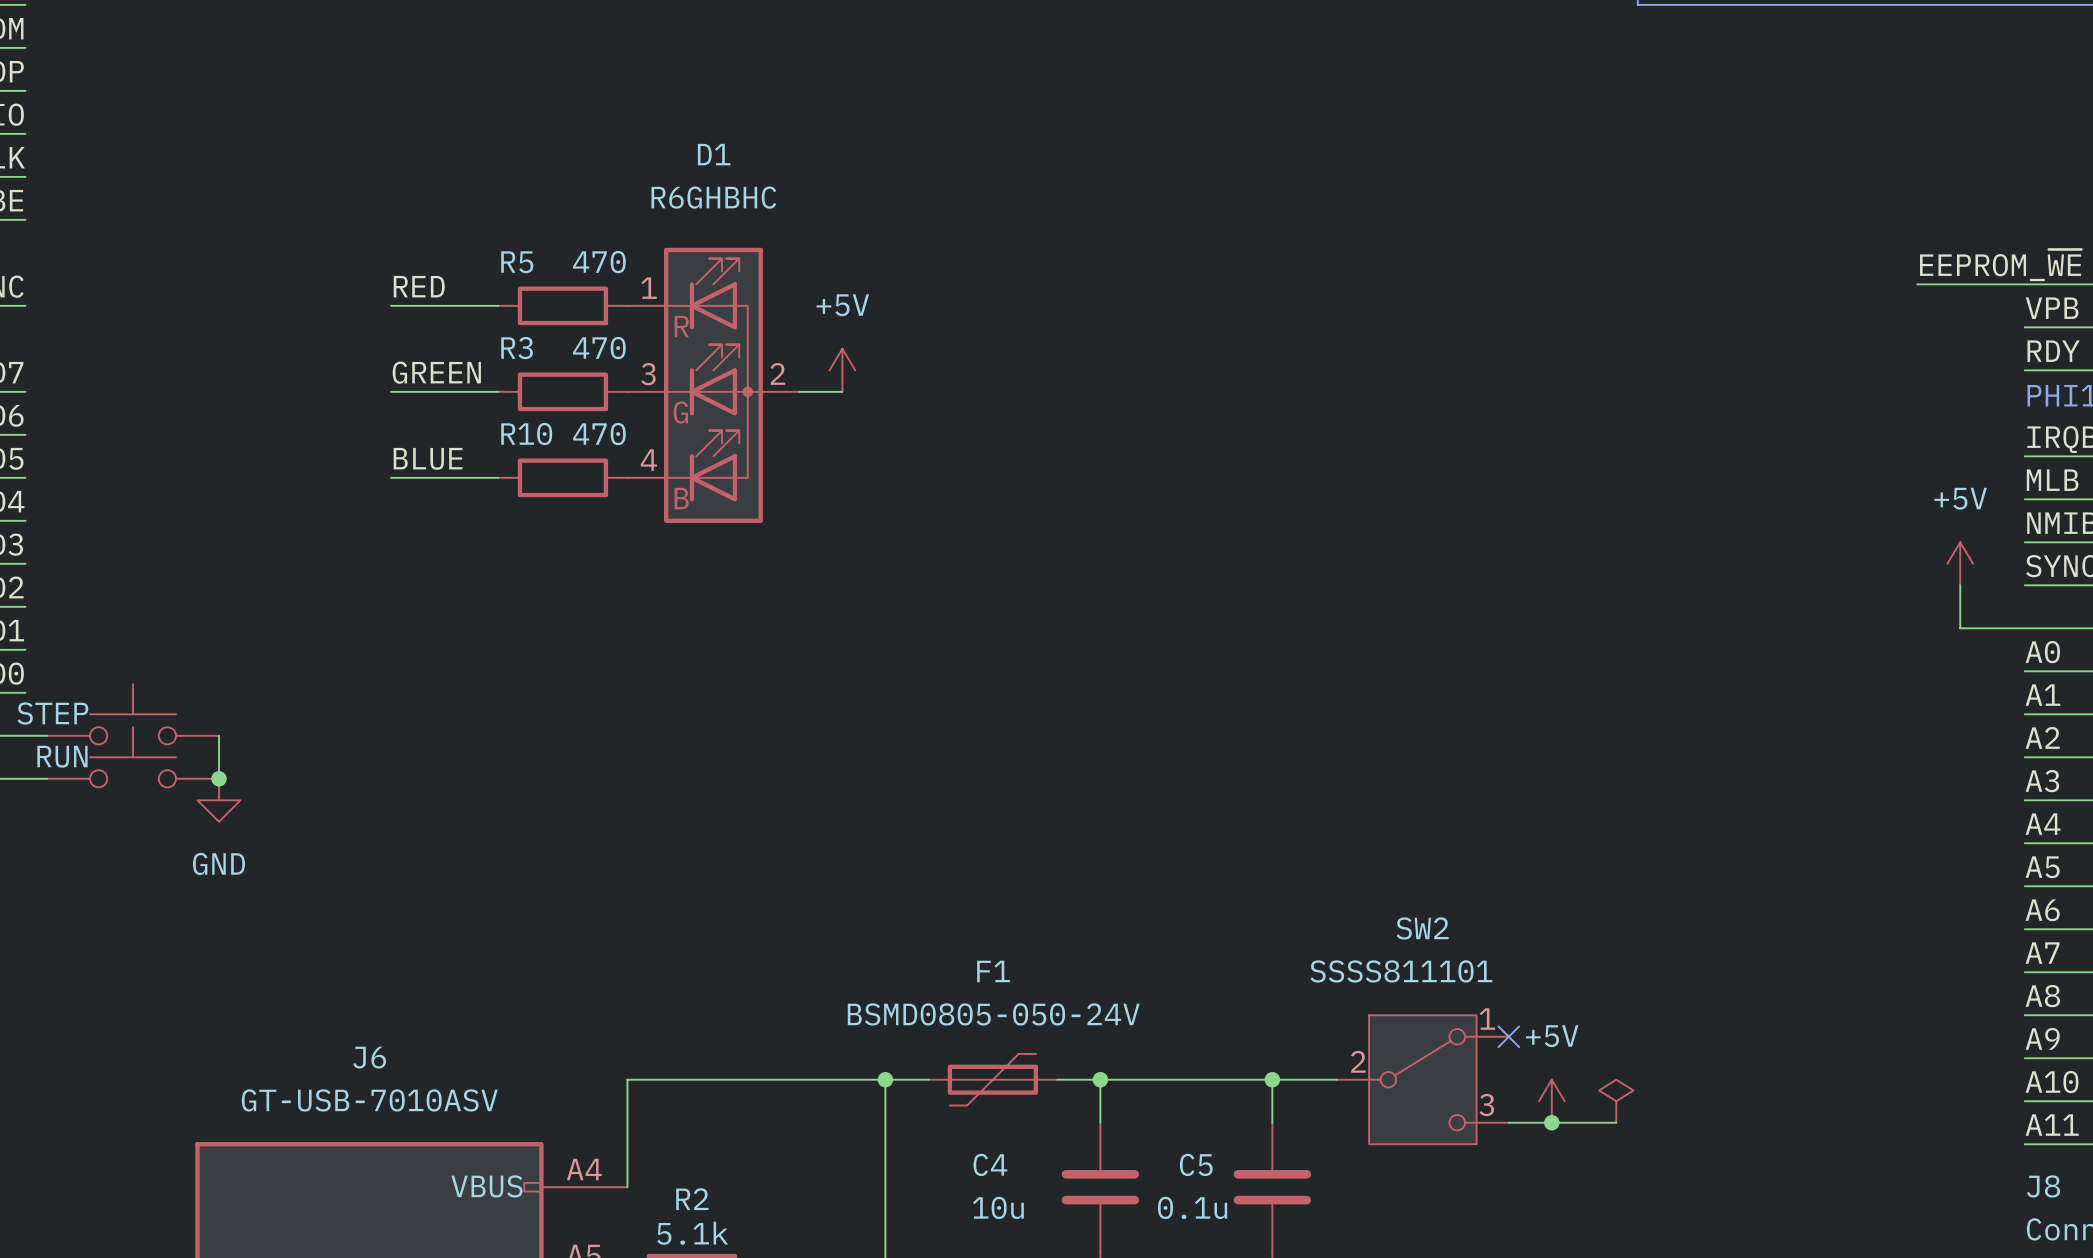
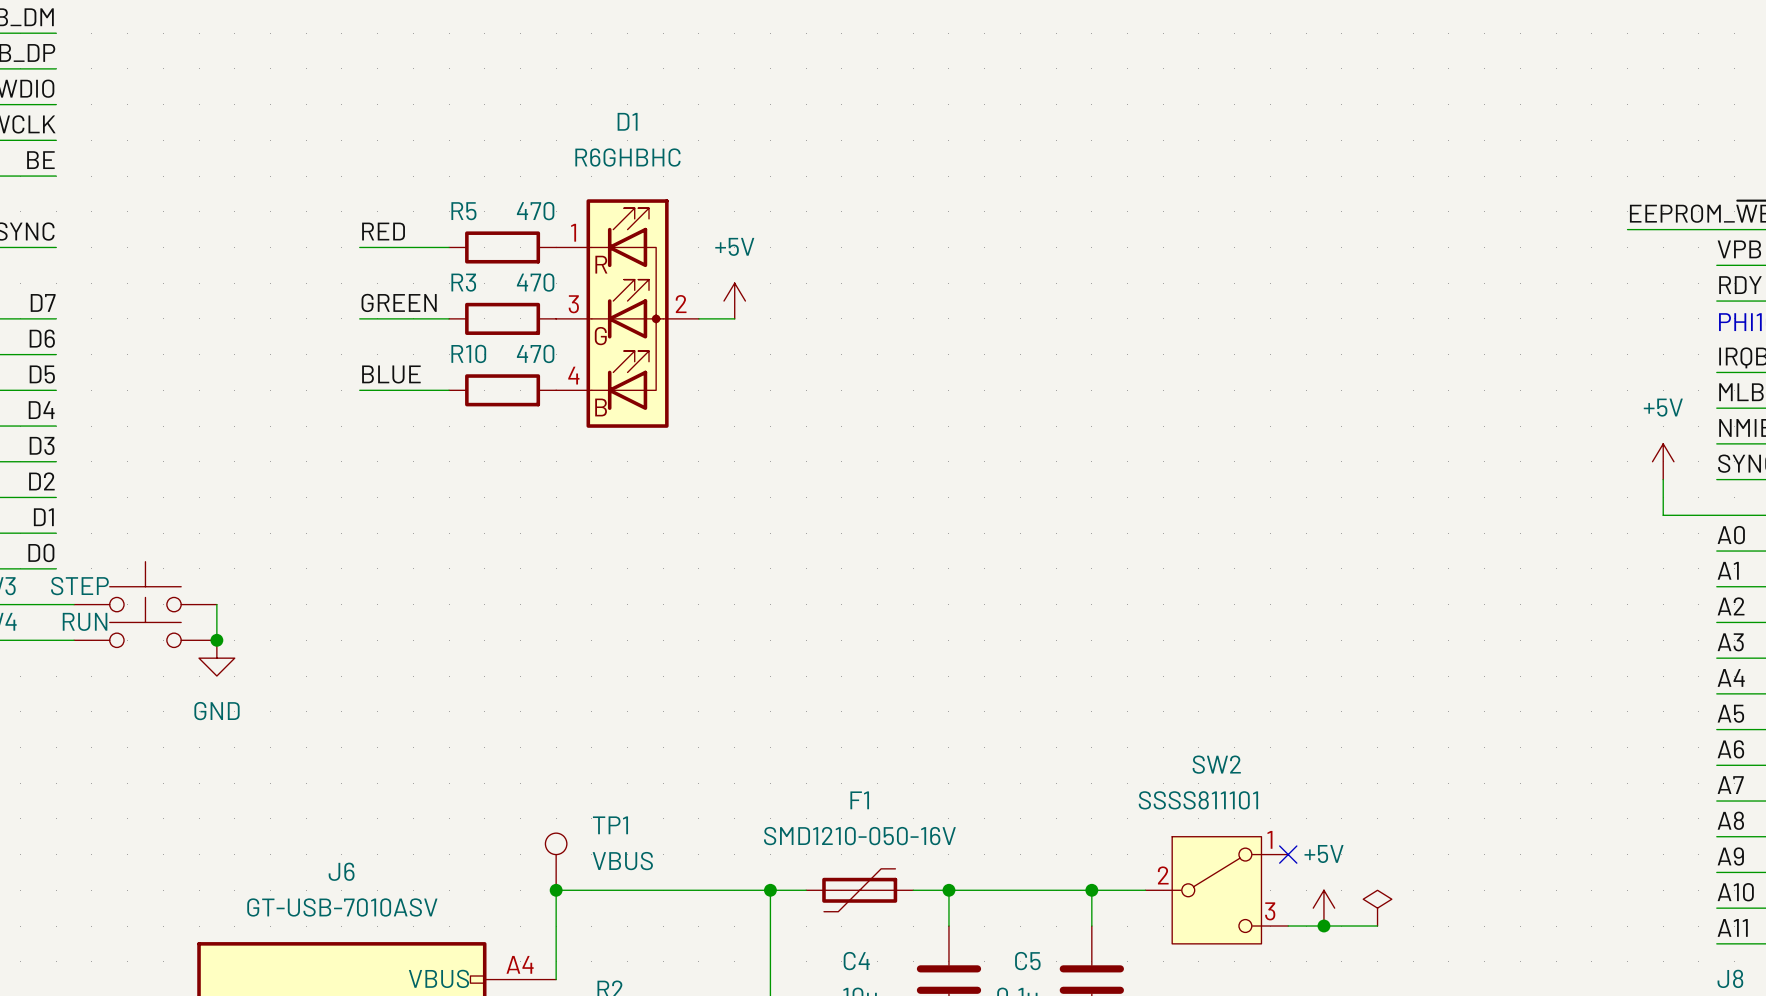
F1 value: BSMD0805-050-24V (993, 1014) -> SMD1210-050-16V (859, 836)
TP1: none -> VBUS (556, 861)
junction: none -> (556, 890)

